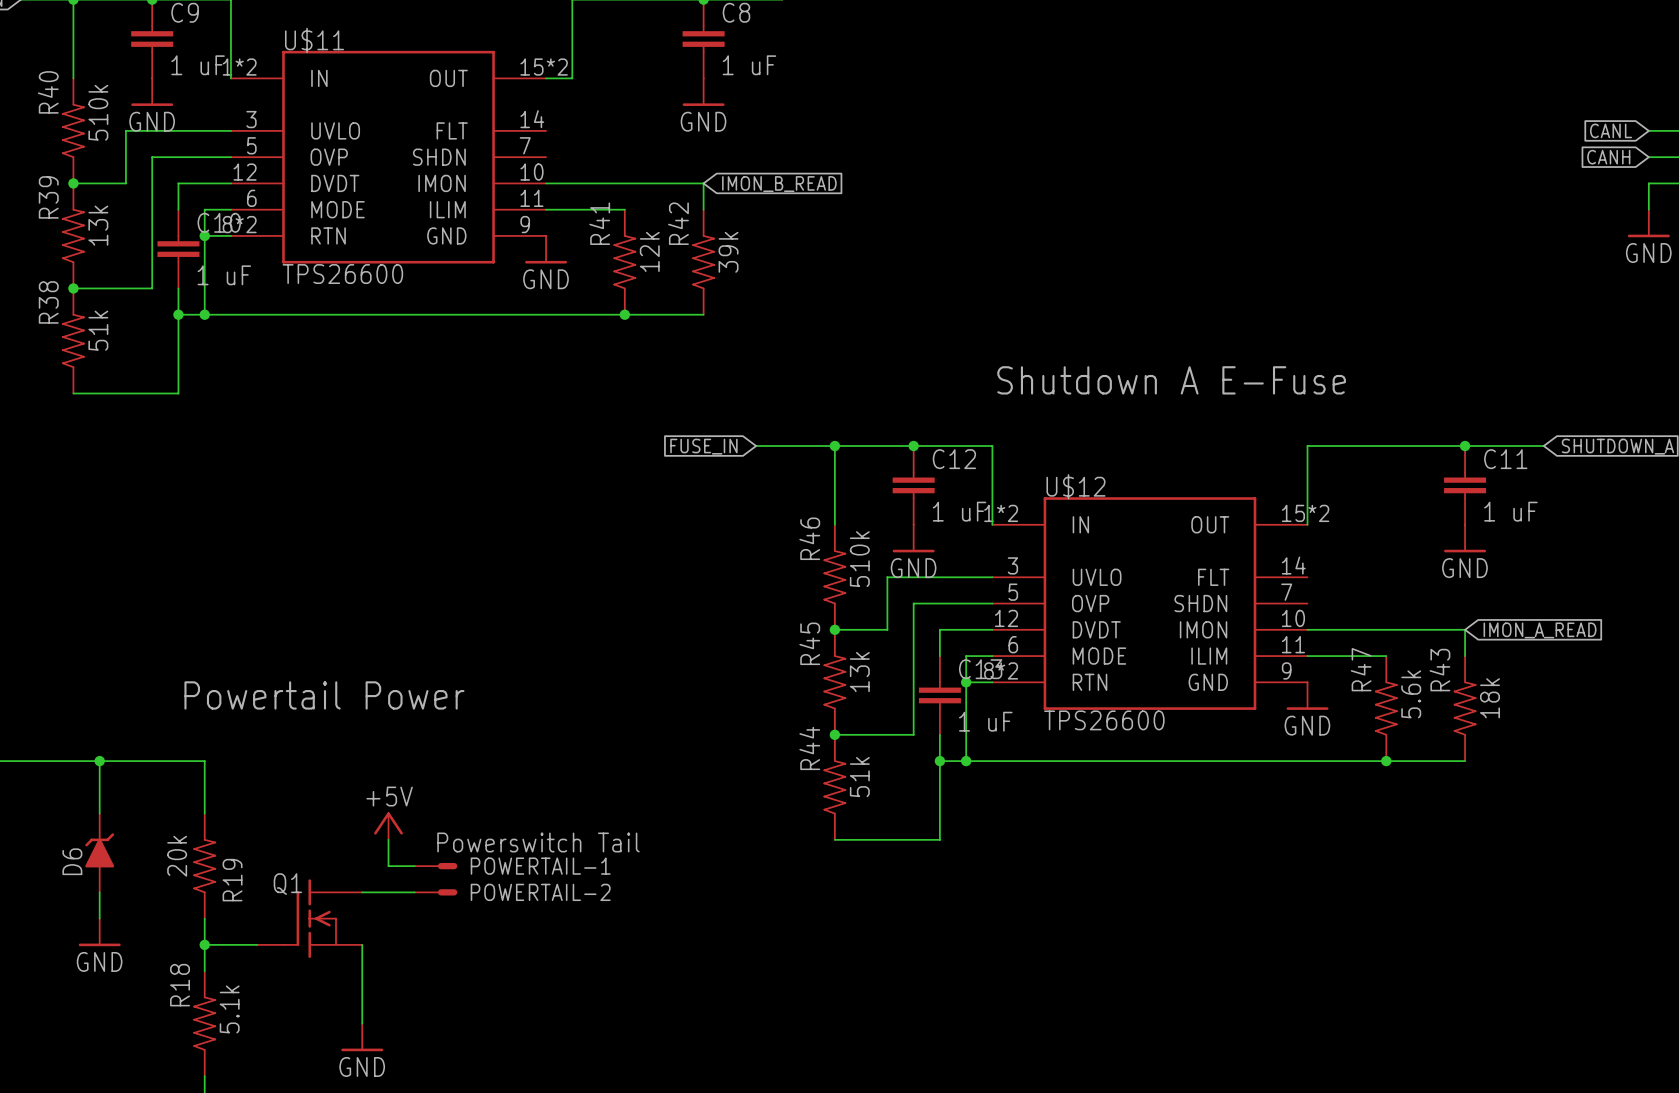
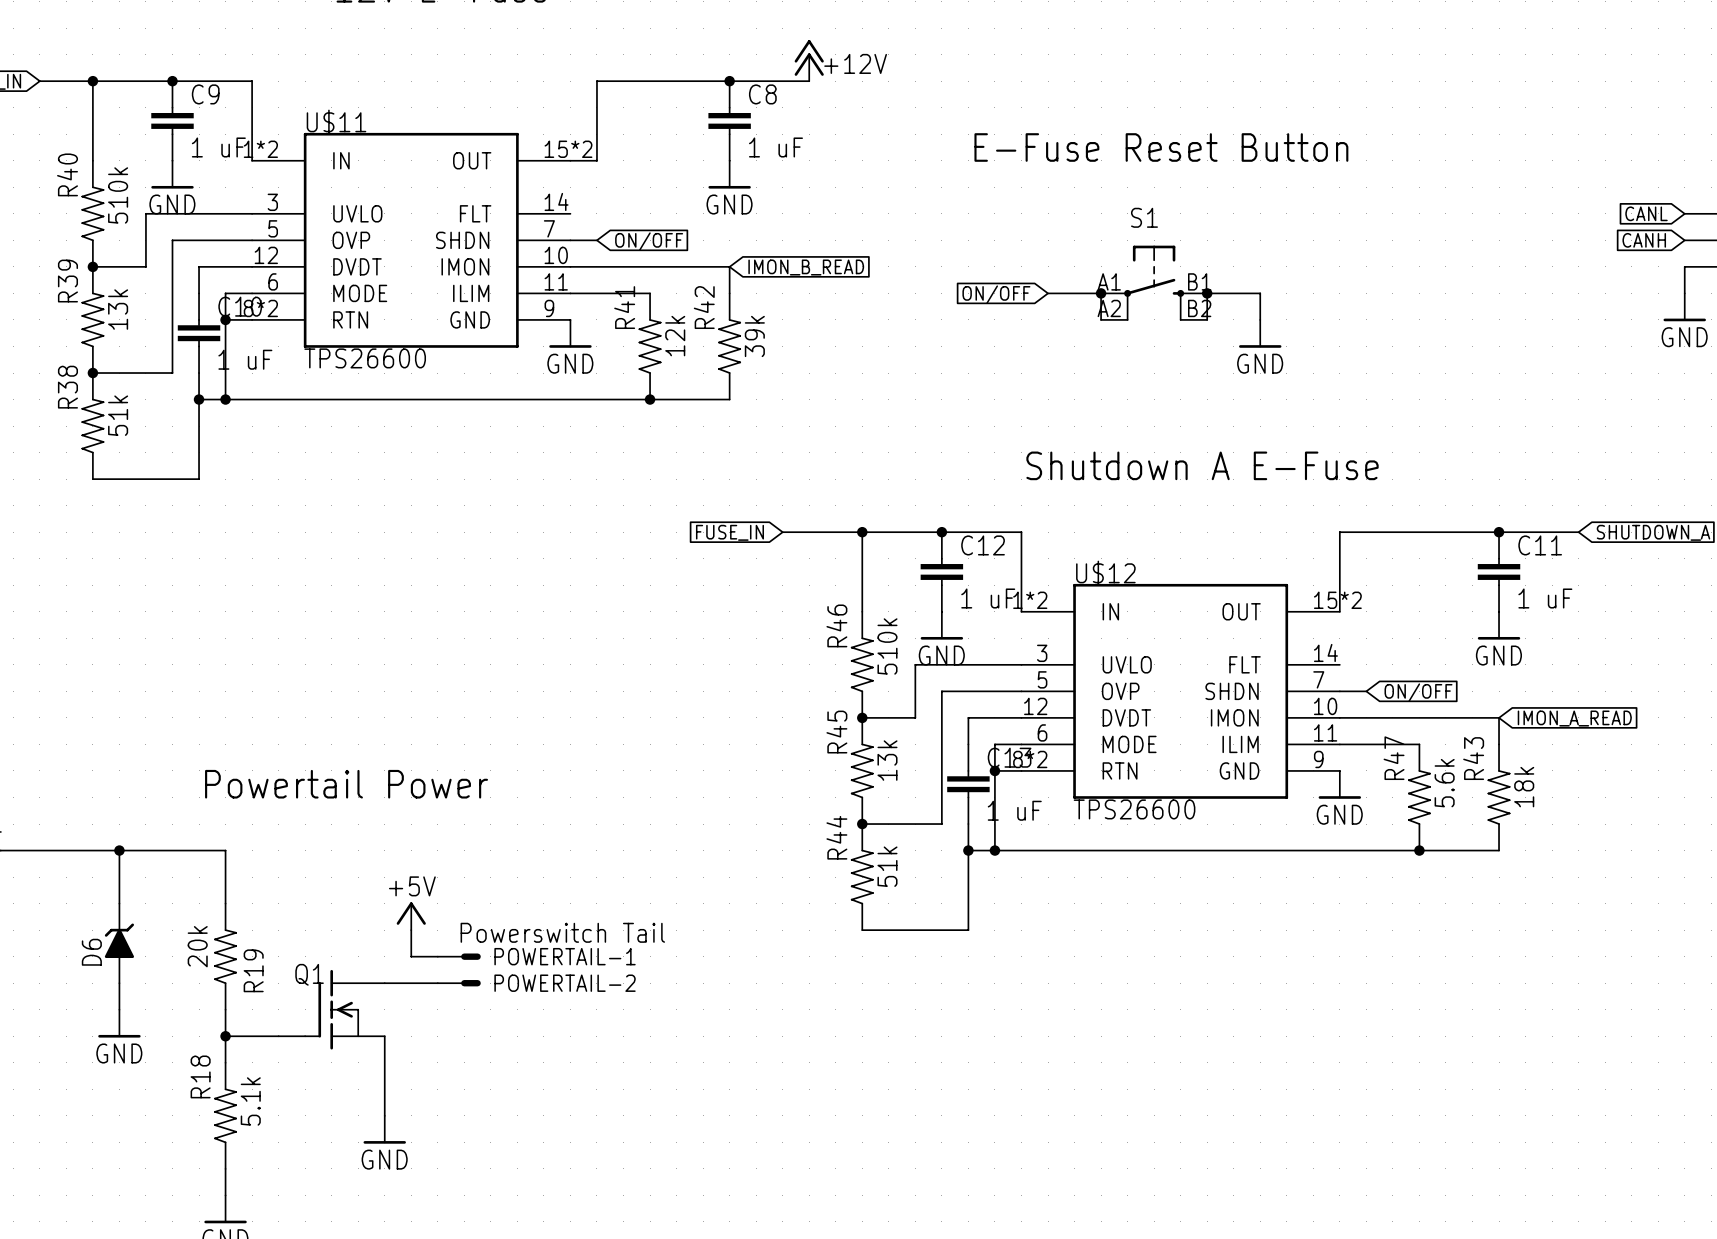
text: none -> E-Fuse Reset Button (1161, 147)
wire: none -> (570, 240) (596, 240)
global label: none -> ON/OFF (649, 241)
S1: none -> (1154, 283)
wire: none -> (1048, 293) (1101, 293) (1101, 319)
junction: none -> (1101, 293)
junction: none -> (1207, 293)
global label: none -> ON/OFF (996, 294)
wire: none -> (1207, 319) (1207, 293) (1260, 293) (1260, 319)
power symbol: none -> GND (1260, 333)
wire: none -> (1339, 691) (1366, 691)
global label: none -> ON/OFF (1418, 692)

